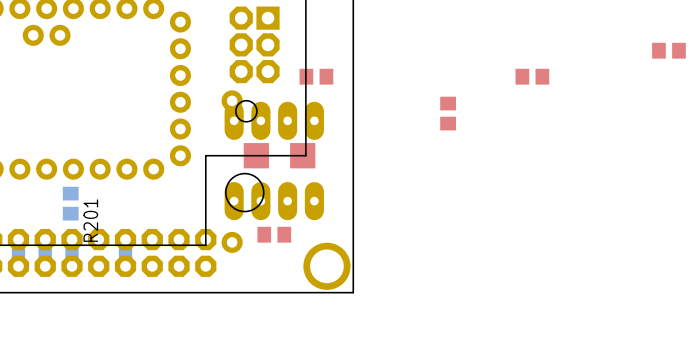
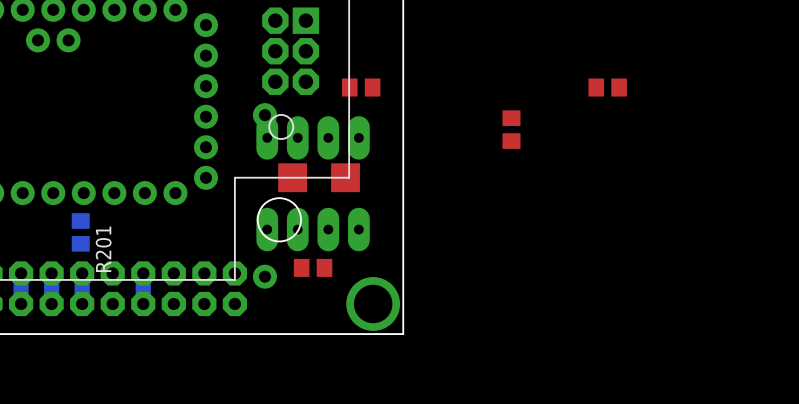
part: (668, 50) -> none

